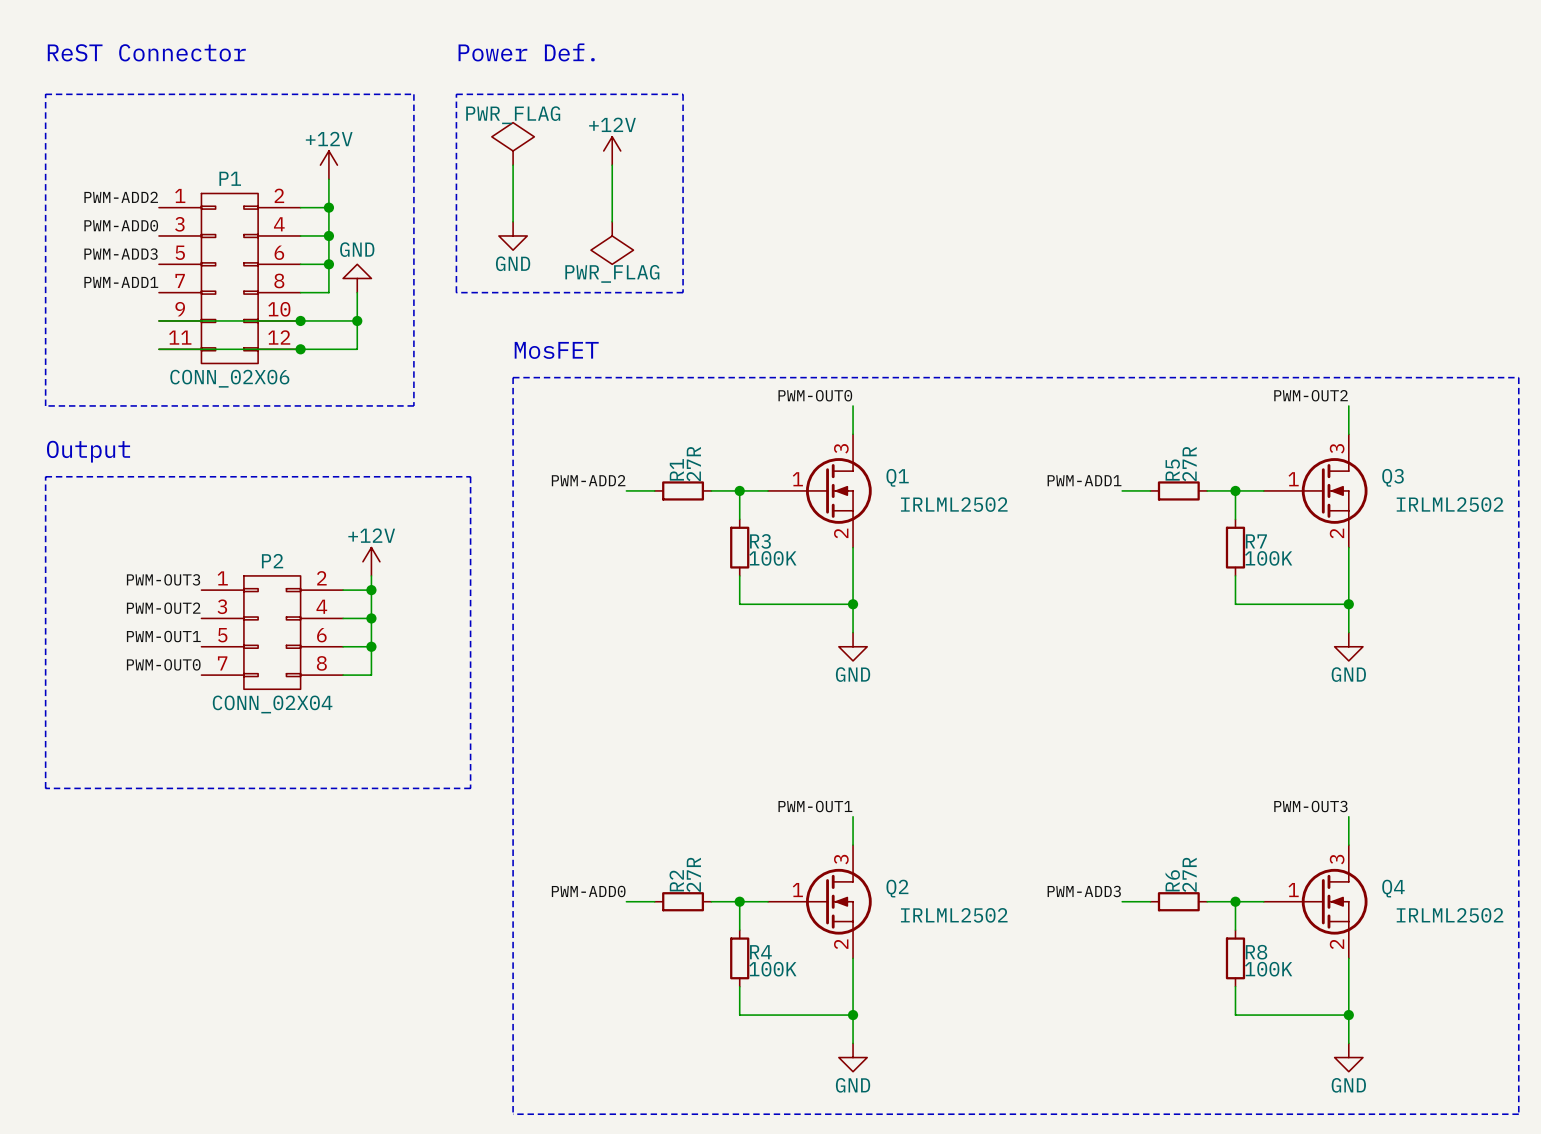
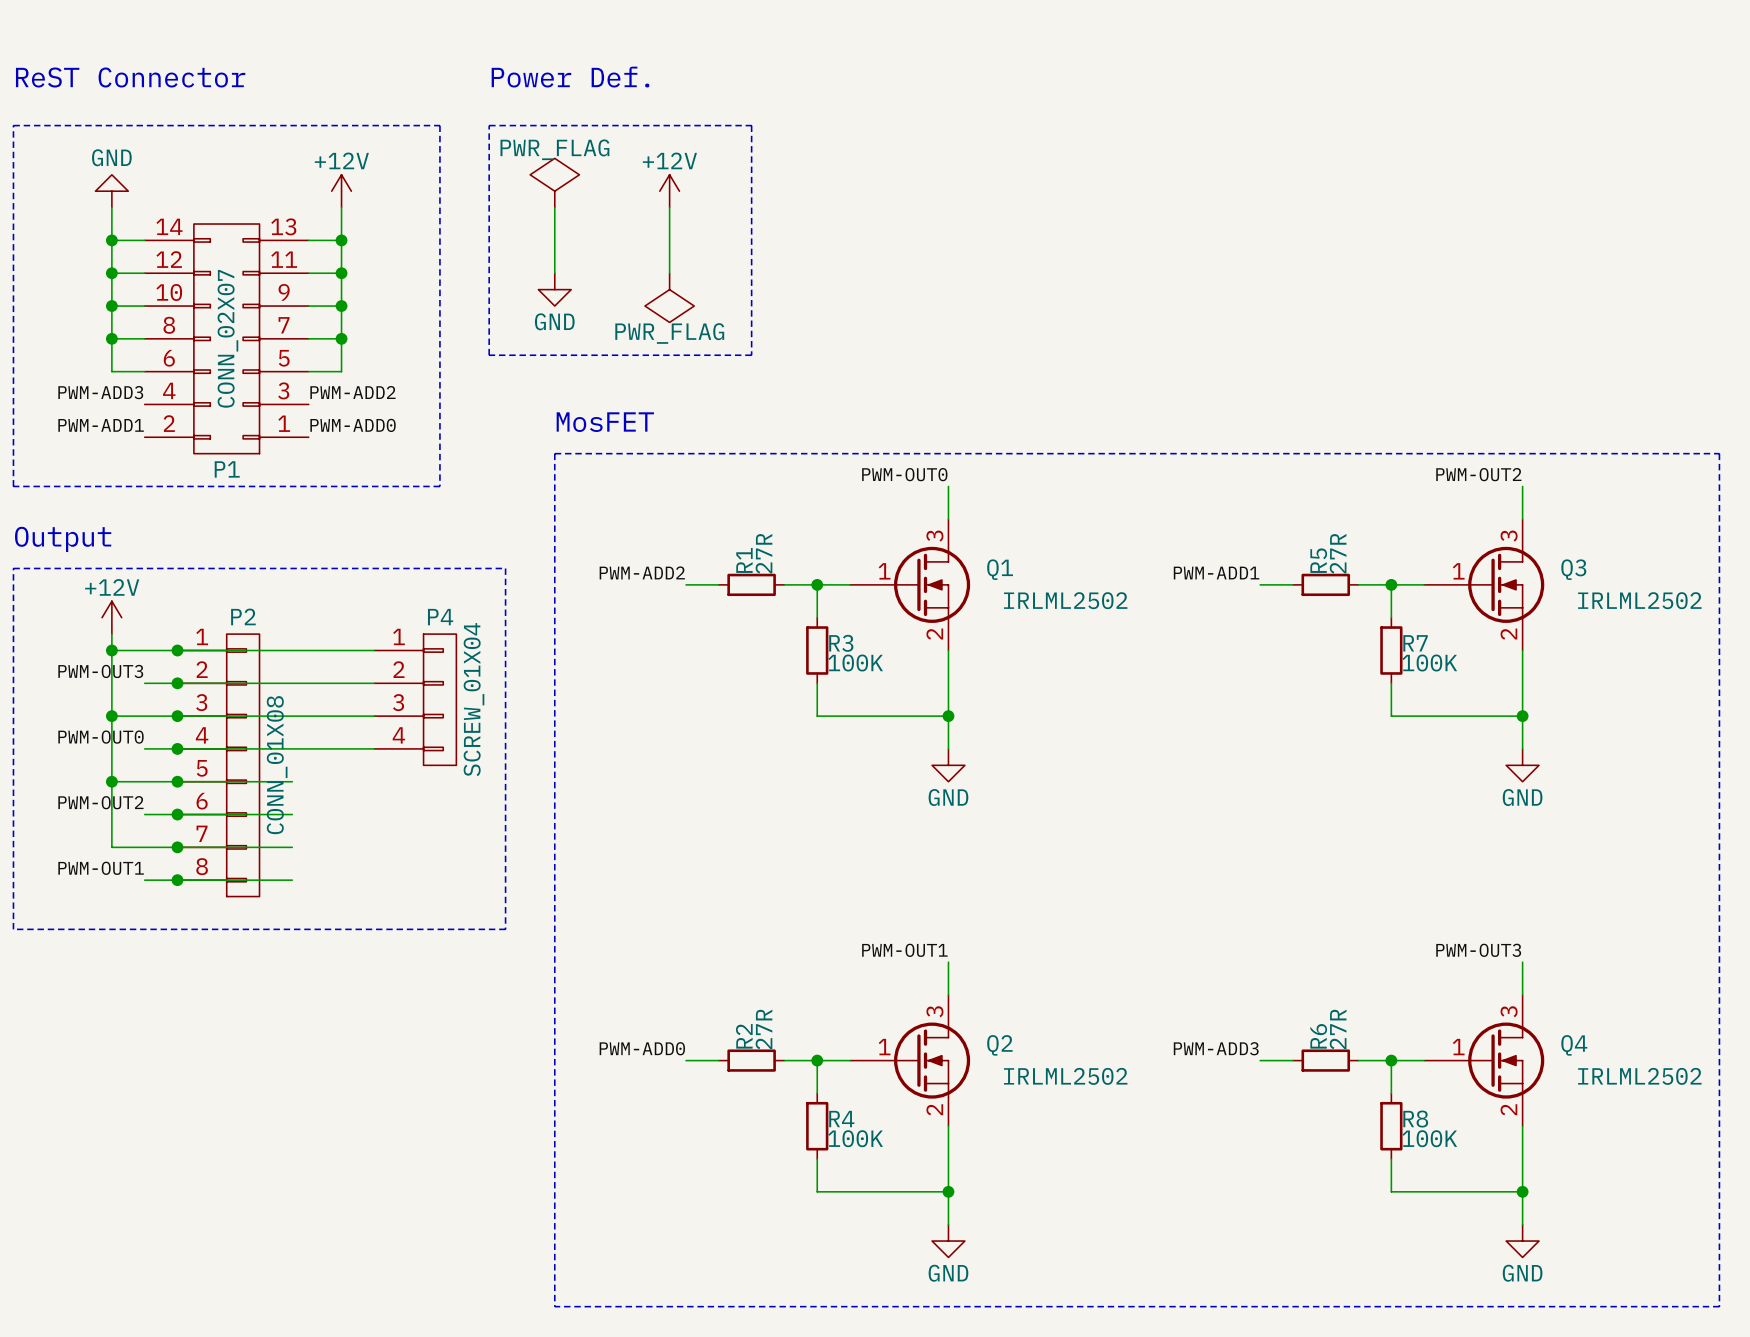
wire: none -> (111, 207) (111, 371) (144, 371)
power symbol position: +12V (328, 165) -> +12V (341, 191)
P1 name position: P1 (230, 178) -> P1 (227, 469)
wire: none -> (111, 240) (144, 240)
junction: none -> (111, 240)
P1 symbol: [158, 193, 301, 364] -> [144, 224, 309, 454]
junction: none -> (341, 240)
label position: PWM-ADD2 (121, 197) -> PWM-ADD2 (352, 392)
wire: (300, 207) (328, 207) -> (308, 240) (341, 240)
junction: (328, 207) -> none
wire: none -> (111, 273) (144, 273)
junction: none -> (111, 273)
junction: none -> (341, 273)
label position: PWM-ADD0 (121, 225) -> PWM-ADD0 (353, 425)
wire: (300, 235) (328, 235) -> (308, 273) (341, 273)
junction: (328, 235) -> none
wire: none -> (111, 306) (144, 306)
junction: none -> (111, 306)
junction: none -> (341, 306)
label position: PWM-ADD3 (121, 254) -> PWM-ADD3 (100, 392)
wire: (300, 264) (328, 264) -> (308, 306) (341, 306)
junction: (328, 264) -> none
wire: none -> (111, 338) (144, 338)
junction: none -> (111, 338)
wire: none -> (308, 338) (341, 338)
junction: none -> (341, 338)
power symbol position: GND (357, 278) -> GND (111, 191)
label position: PWM-ADD1 (121, 282) -> PWM-ADD1 (101, 425)
wire: (300, 292) (328, 292) -> (308, 371) (341, 371) (341, 355)
wire: (357, 292) (357, 349) (158, 349) -> none
wire: (158, 320) (357, 320) -> (144, 683) (374, 683)
junction: (300, 320) -> none
junction: (357, 320) -> none
junction: (300, 349) -> none
P1 value: CONN_02X06 (229, 378) -> CONN_02X07 (227, 338)
power symbol: none -> +12V (111, 617)
wire: none -> (111, 634) (111, 847) (292, 847)
wire: none -> (111, 650) (374, 650)
junction: none -> (111, 650)
junction: none -> (177, 650)
P2 name position: P2 (272, 561) -> P2 (243, 616)
power symbol: +12V (371, 561) -> none
junction: none -> (177, 683)
P2 symbol: [201, 575, 344, 690] -> [177, 634, 260, 897]
wire: (371, 575) (371, 675) (343, 675) -> none
label position: PWM-OUT3 (163, 579) -> PWM-OUT3 (100, 671)
wire: (343, 590) (371, 590) -> none
junction: (371, 590) -> none
P4: none -> SCREW_01X04 (415, 699)
wire: none -> (111, 716) (374, 716)
junction: none -> (111, 716)
junction: none -> (177, 716)
label position: PWM-OUT2 (163, 608) -> PWM-OUT2 (100, 802)
wire: (343, 618) (371, 618) -> none
junction: (371, 618) -> none
wire: none -> (144, 748) (374, 748)
junction: none -> (177, 748)
label position: PWM-OUT1 (163, 636) -> PWM-OUT1 (101, 868)
wire: (343, 646) (371, 646) -> none
junction: (371, 646) -> none
wire: none -> (111, 781) (292, 781)
junction: none -> (111, 781)
junction: none -> (177, 781)
label position: PWM-OUT0 (163, 664) -> PWM-OUT0 (101, 737)
wire: none -> (144, 814) (292, 814)
junction: none -> (177, 814)
P2 value: CONN_02X04 (272, 704) -> CONN_01X08 (277, 765)
junction: none -> (177, 847)
wire: none -> (144, 880) (292, 880)
junction: none -> (177, 880)

